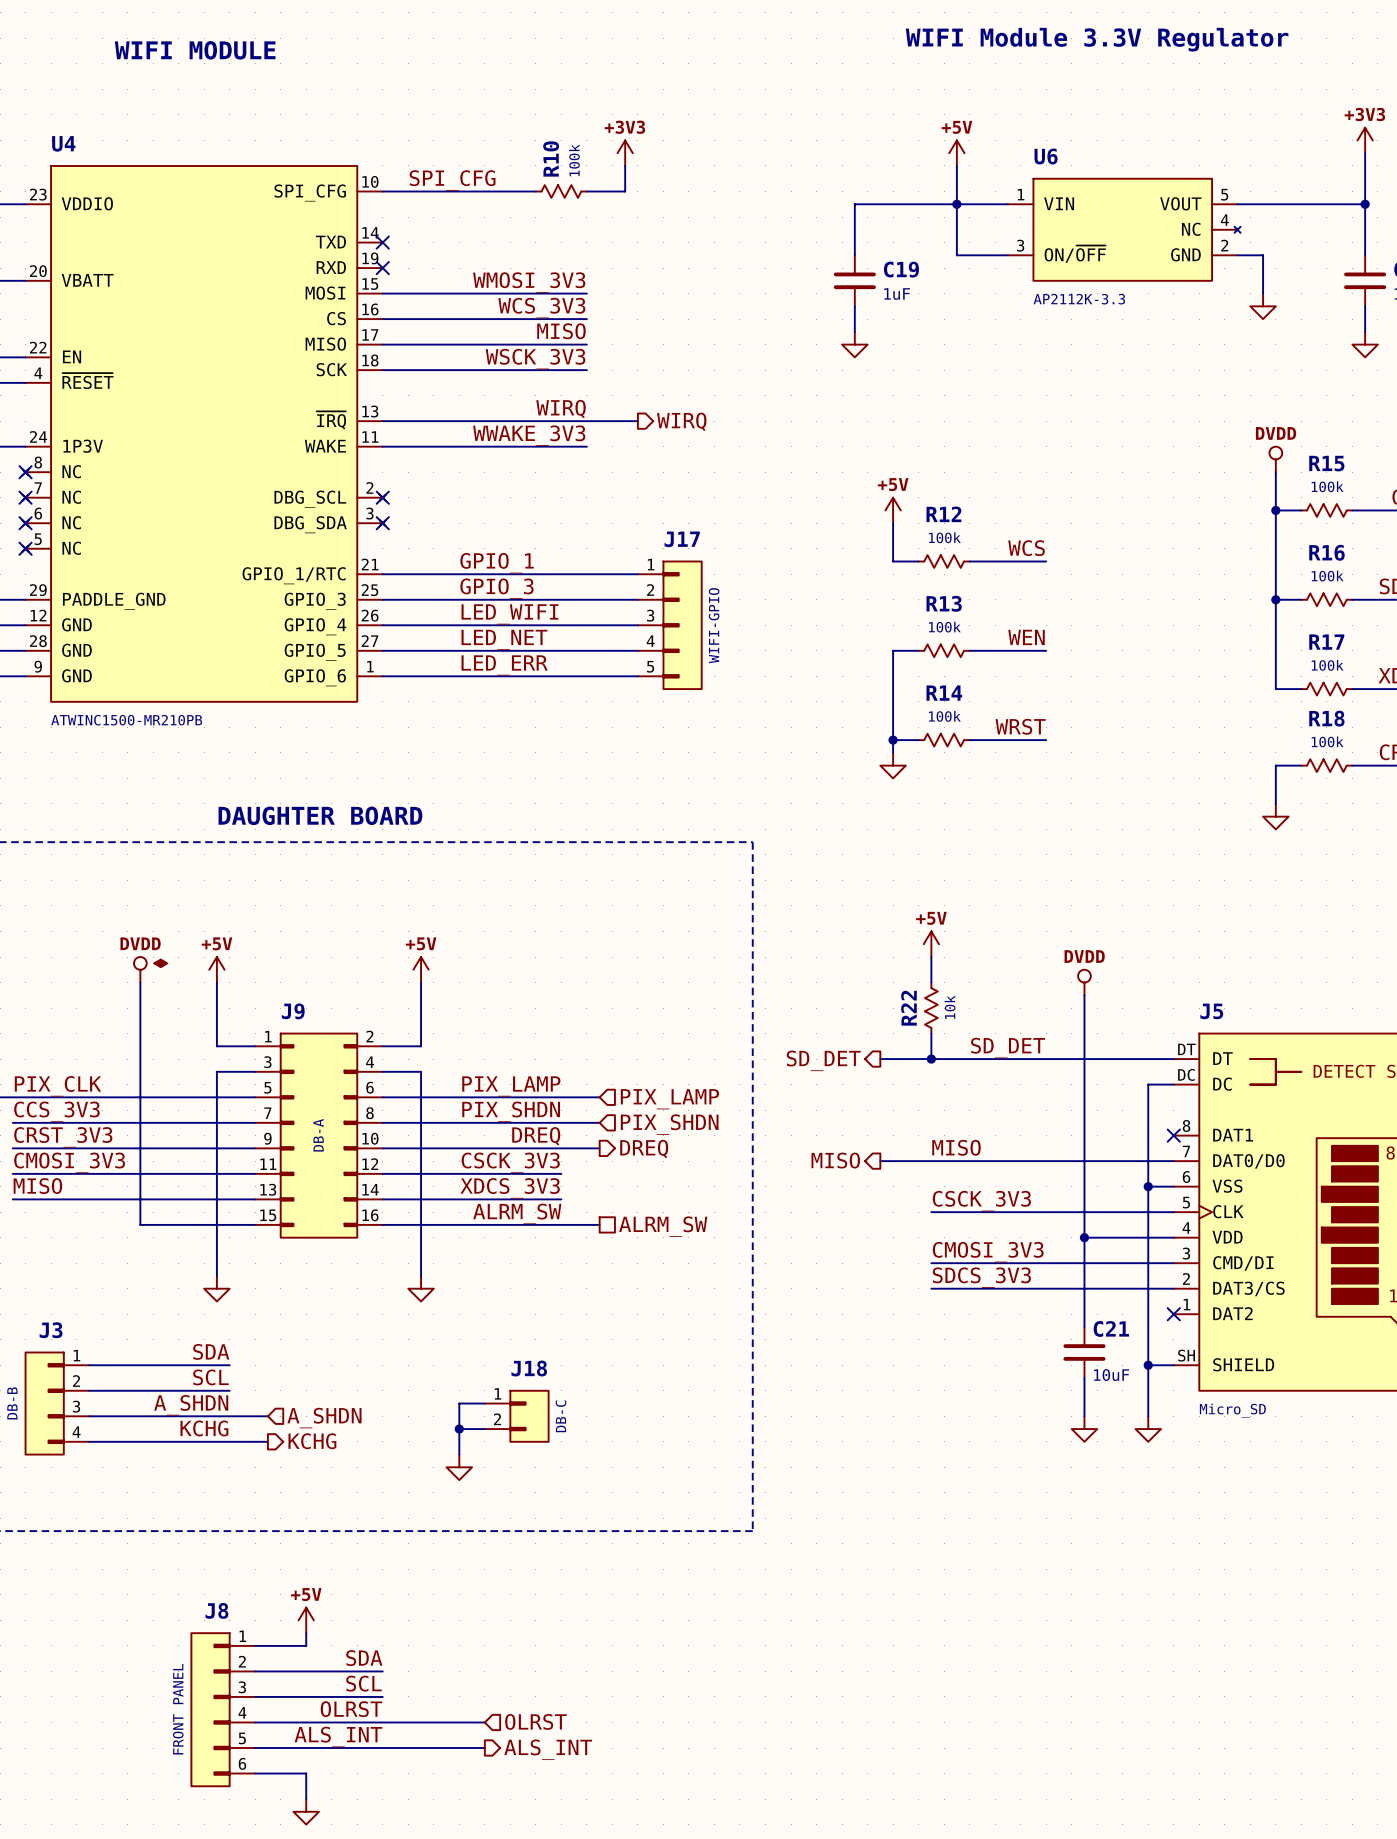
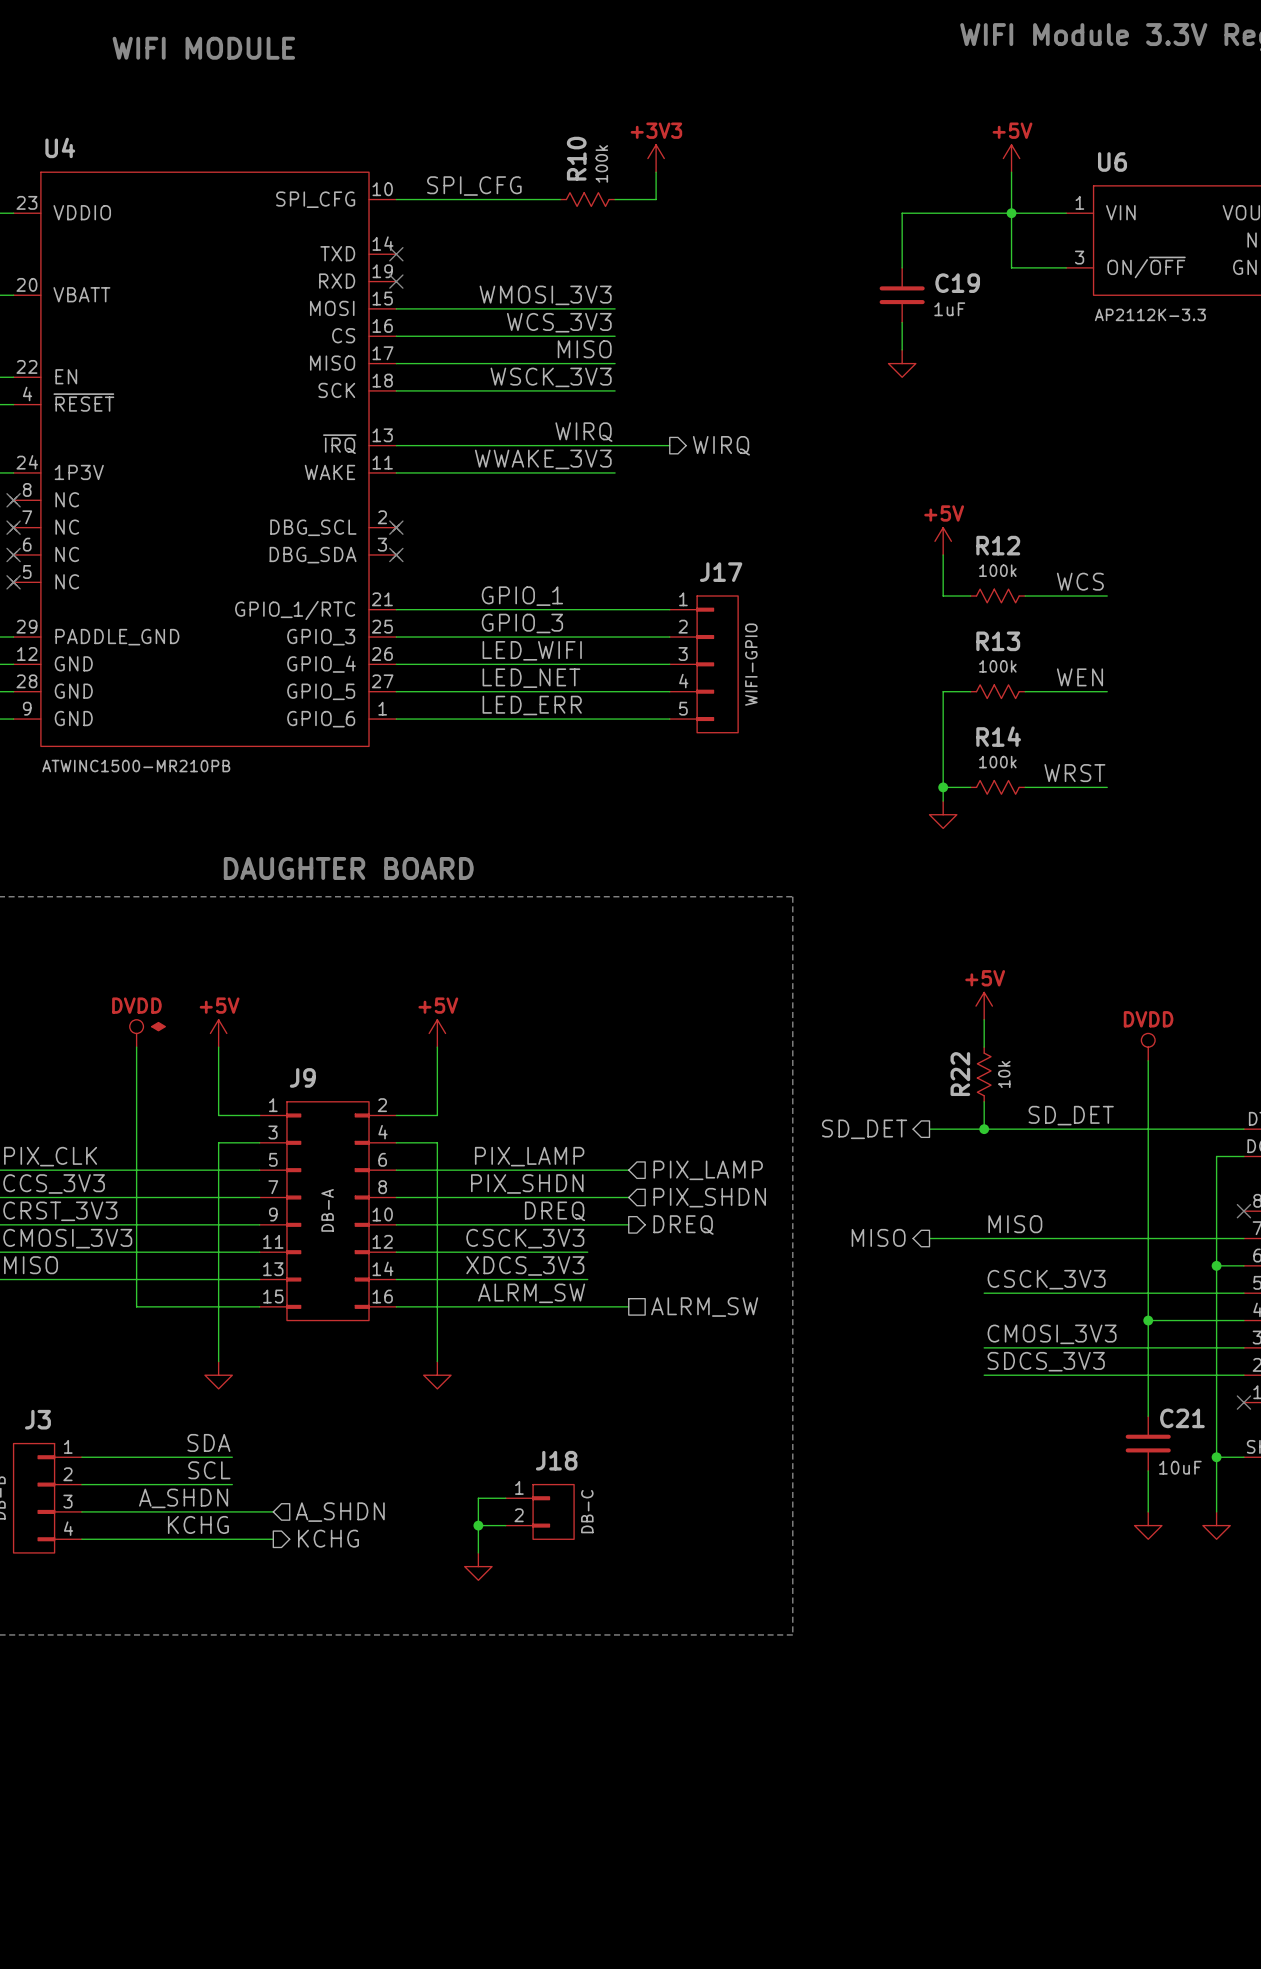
power symbol: (306, 1620) -> none
wire: (306, 1633) (306, 1645) (255, 1645) -> none
label: SDA (364, 1658) -> none
wire: (255, 1671) (382, 1671) -> none
label: SCL (364, 1683) -> none
wire: (255, 1696) (382, 1696) -> none
J8: FRONT PANEL (223, 1709) -> none
label: OLRST (351, 1709) -> none
hierarchical label: OLRST (535, 1721) -> none
wire: (255, 1722) (484, 1722) -> none
label: ALS_INT (338, 1736) -> none
wire: (255, 1748) (484, 1748) -> none
hierarchical label: ALS_INT (548, 1749) -> none
wire: (255, 1773) (306, 1773) (306, 1799) -> none
power symbol: (306, 1811) -> none

